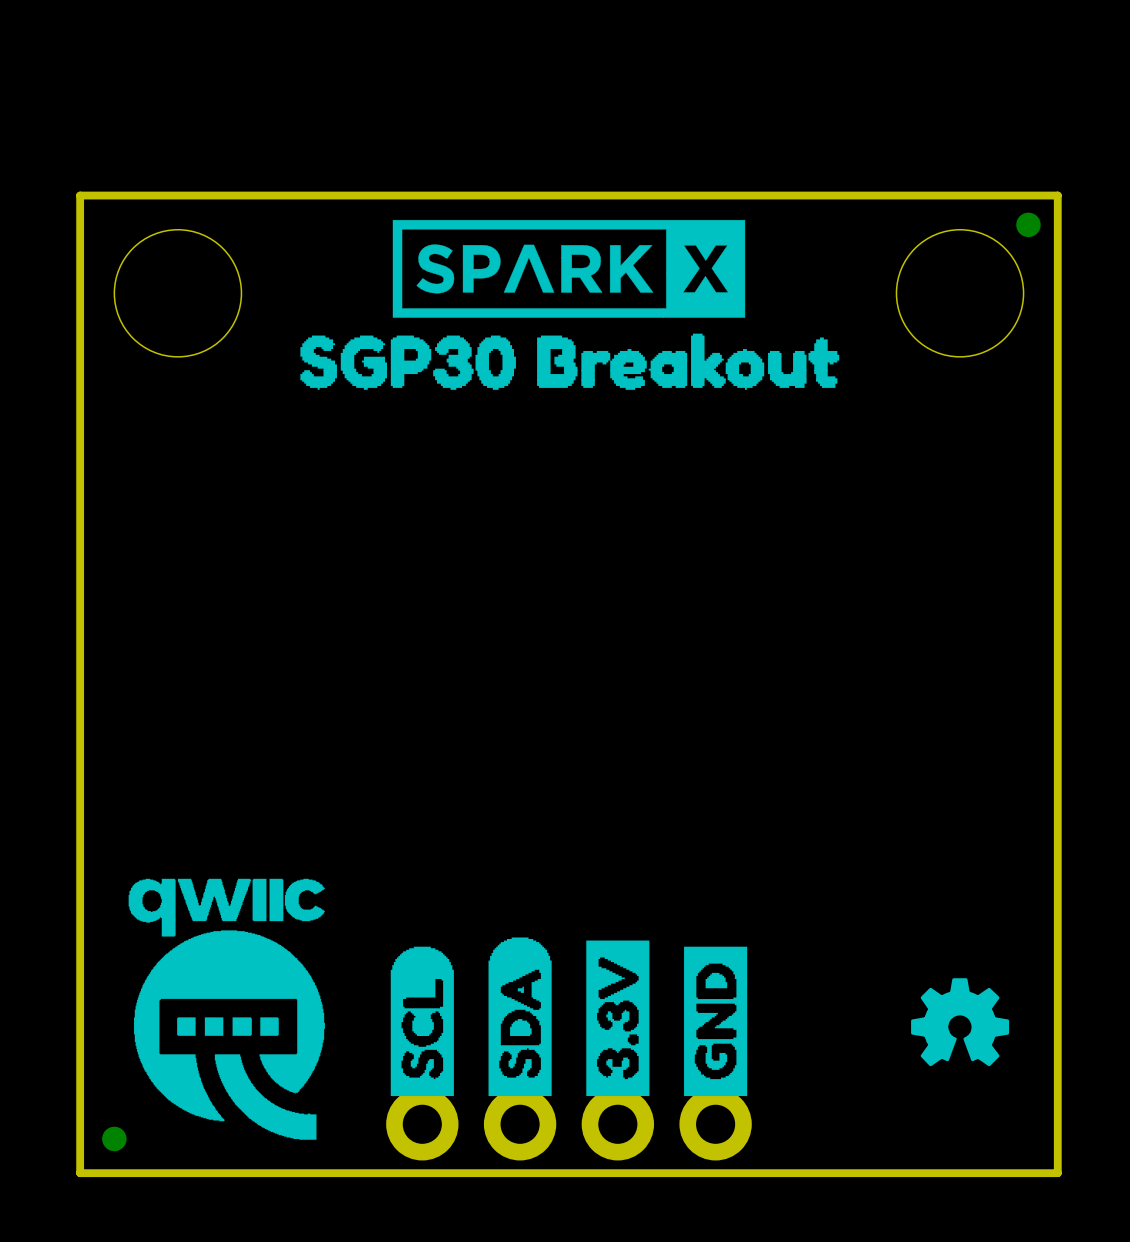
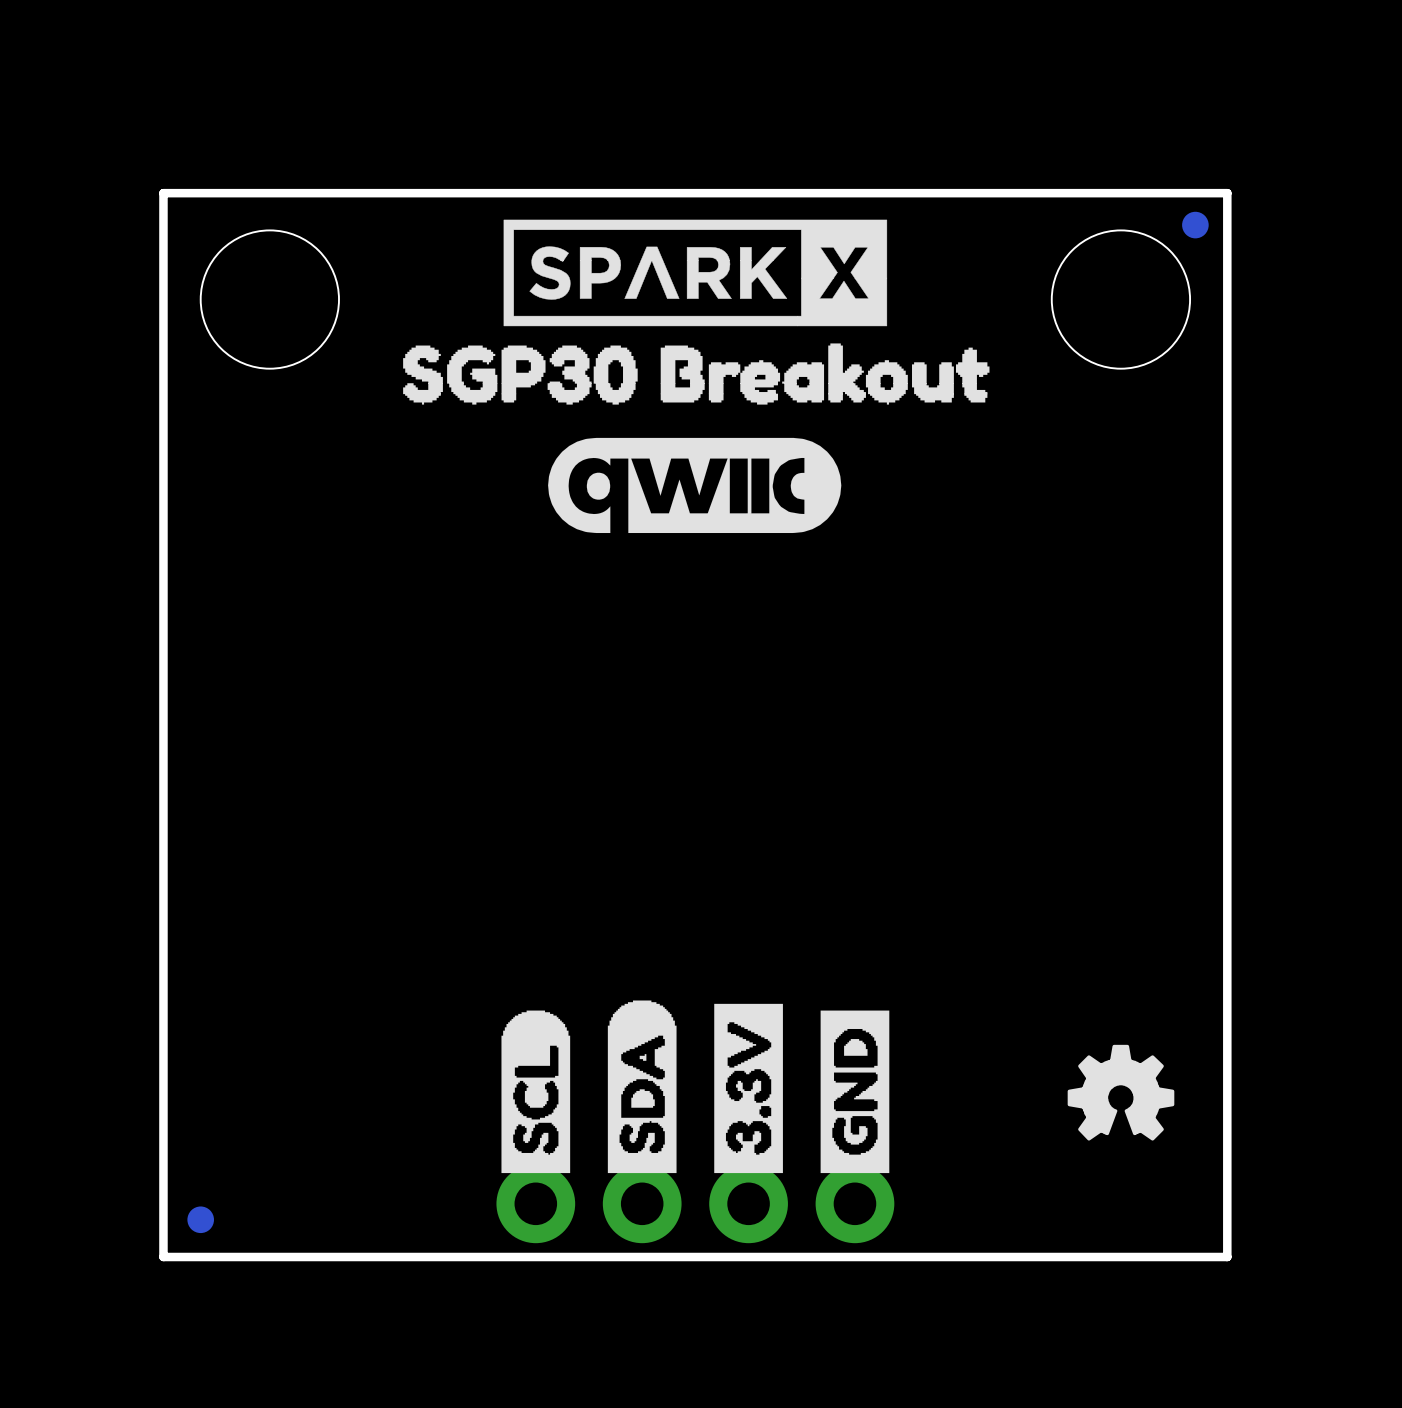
drawing: none -> [548, 437, 842, 534]
drawing: [128, 878, 325, 1140] -> none

